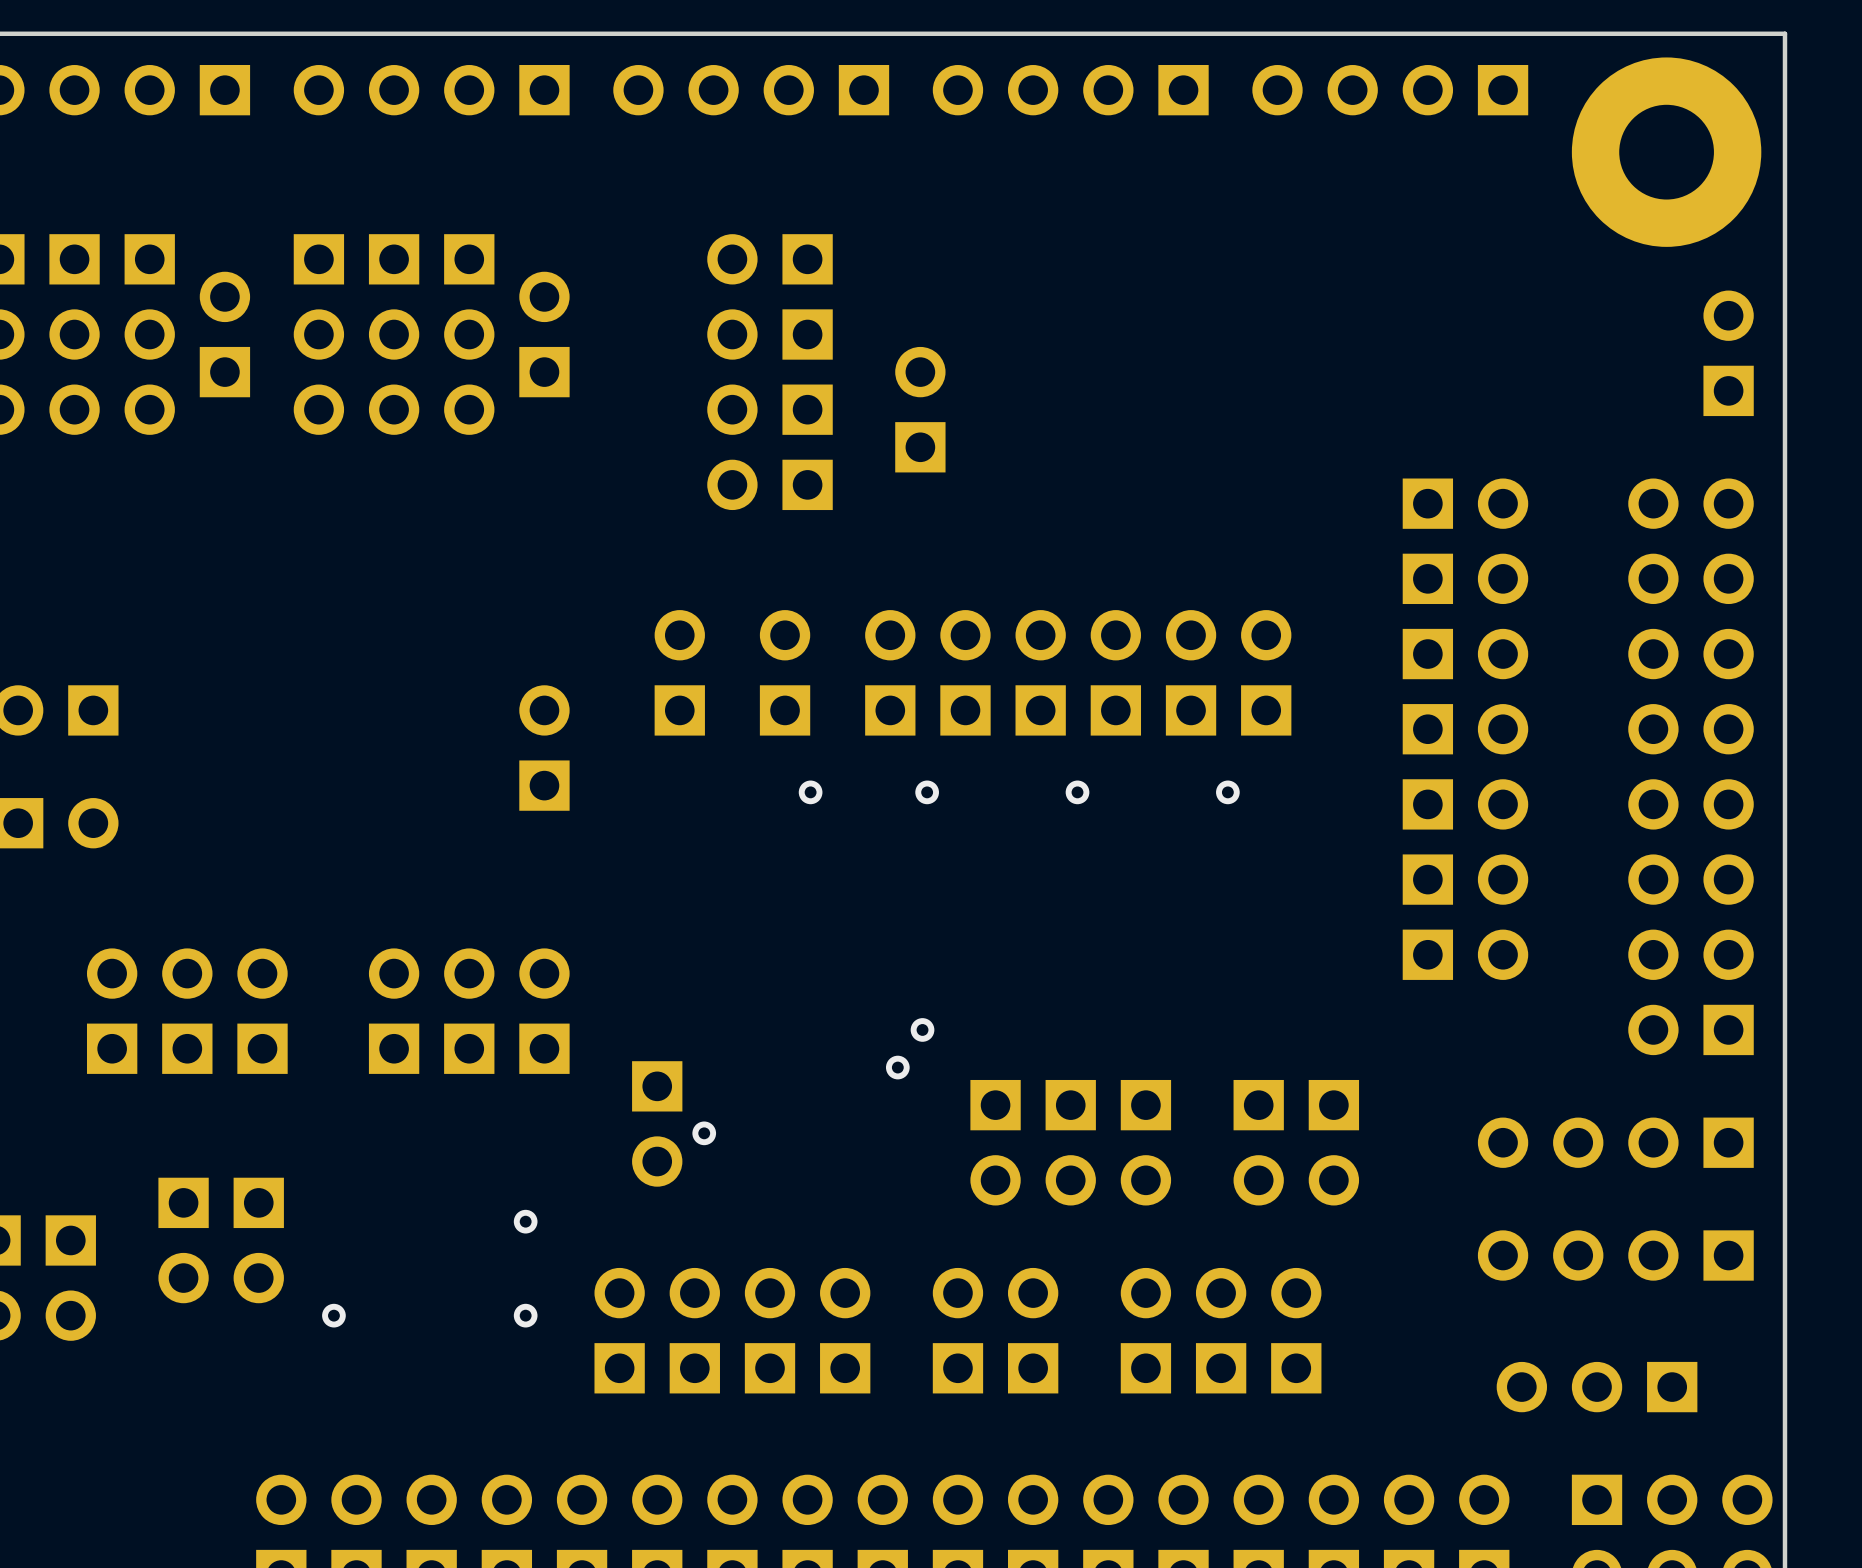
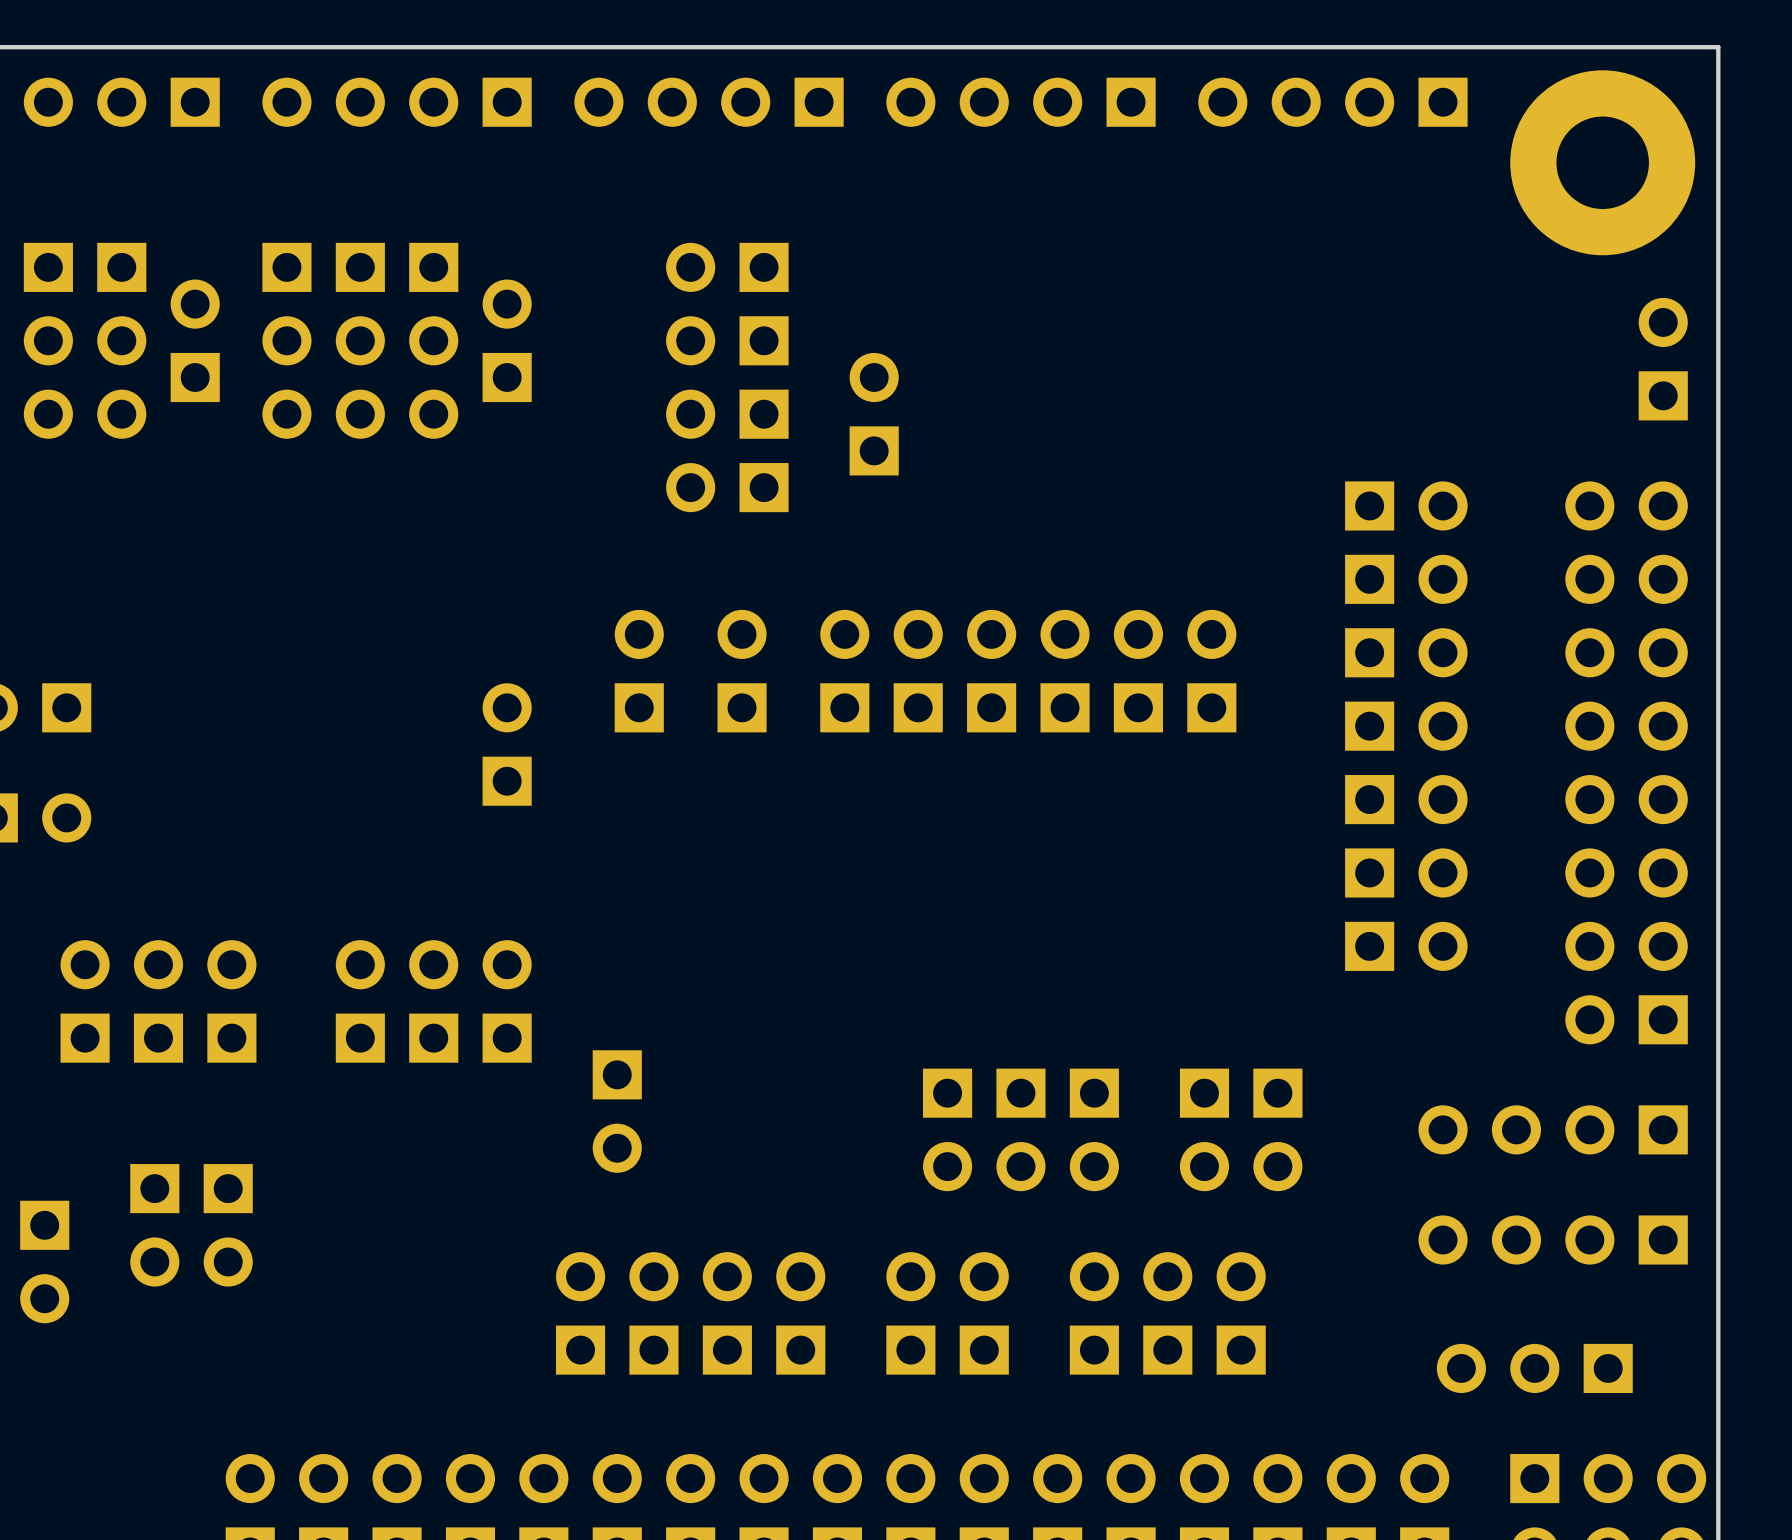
via: (810, 792) -> none
via: (927, 792) -> none
via: (1077, 792) -> none
via: (1227, 792) -> none
via: (922, 1029) -> none
via: (897, 1067) -> none
via: (704, 1133) -> none
via: (525, 1221) -> none
via: (333, 1315) -> none
via: (525, 1315) -> none

